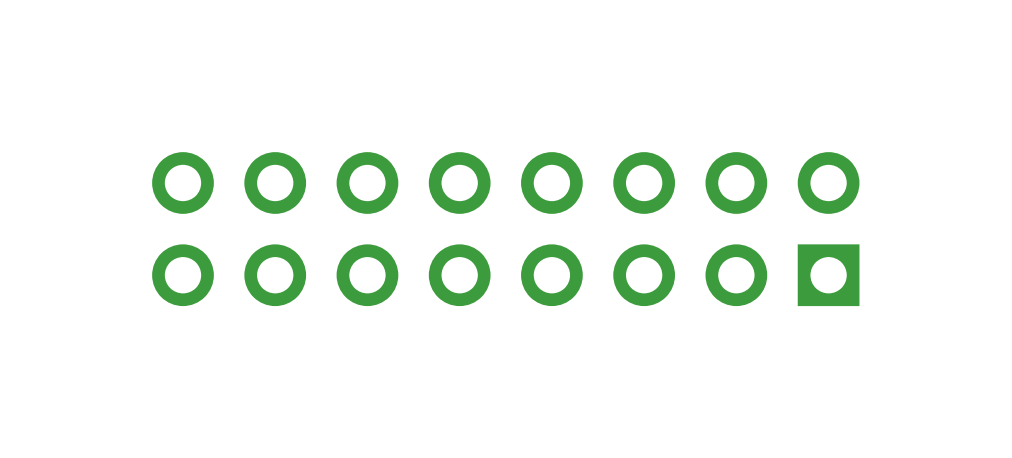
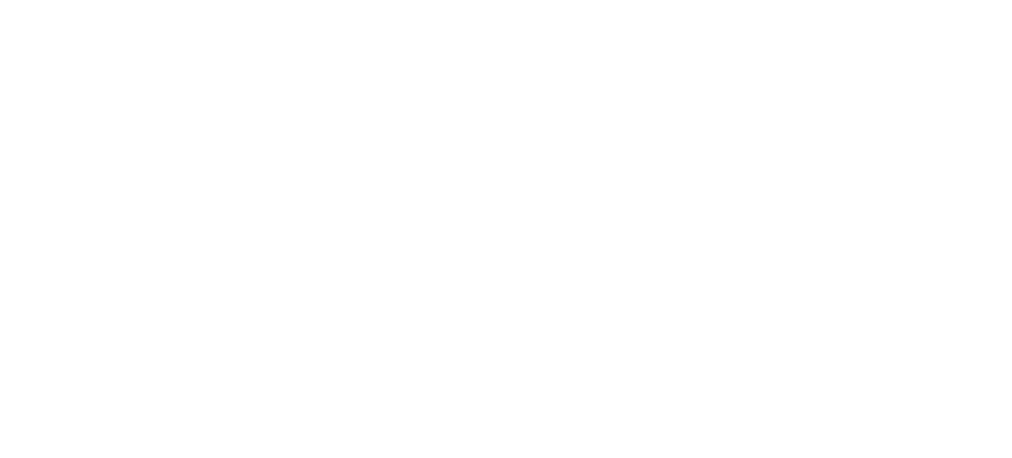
part: (505, 229) -> none

